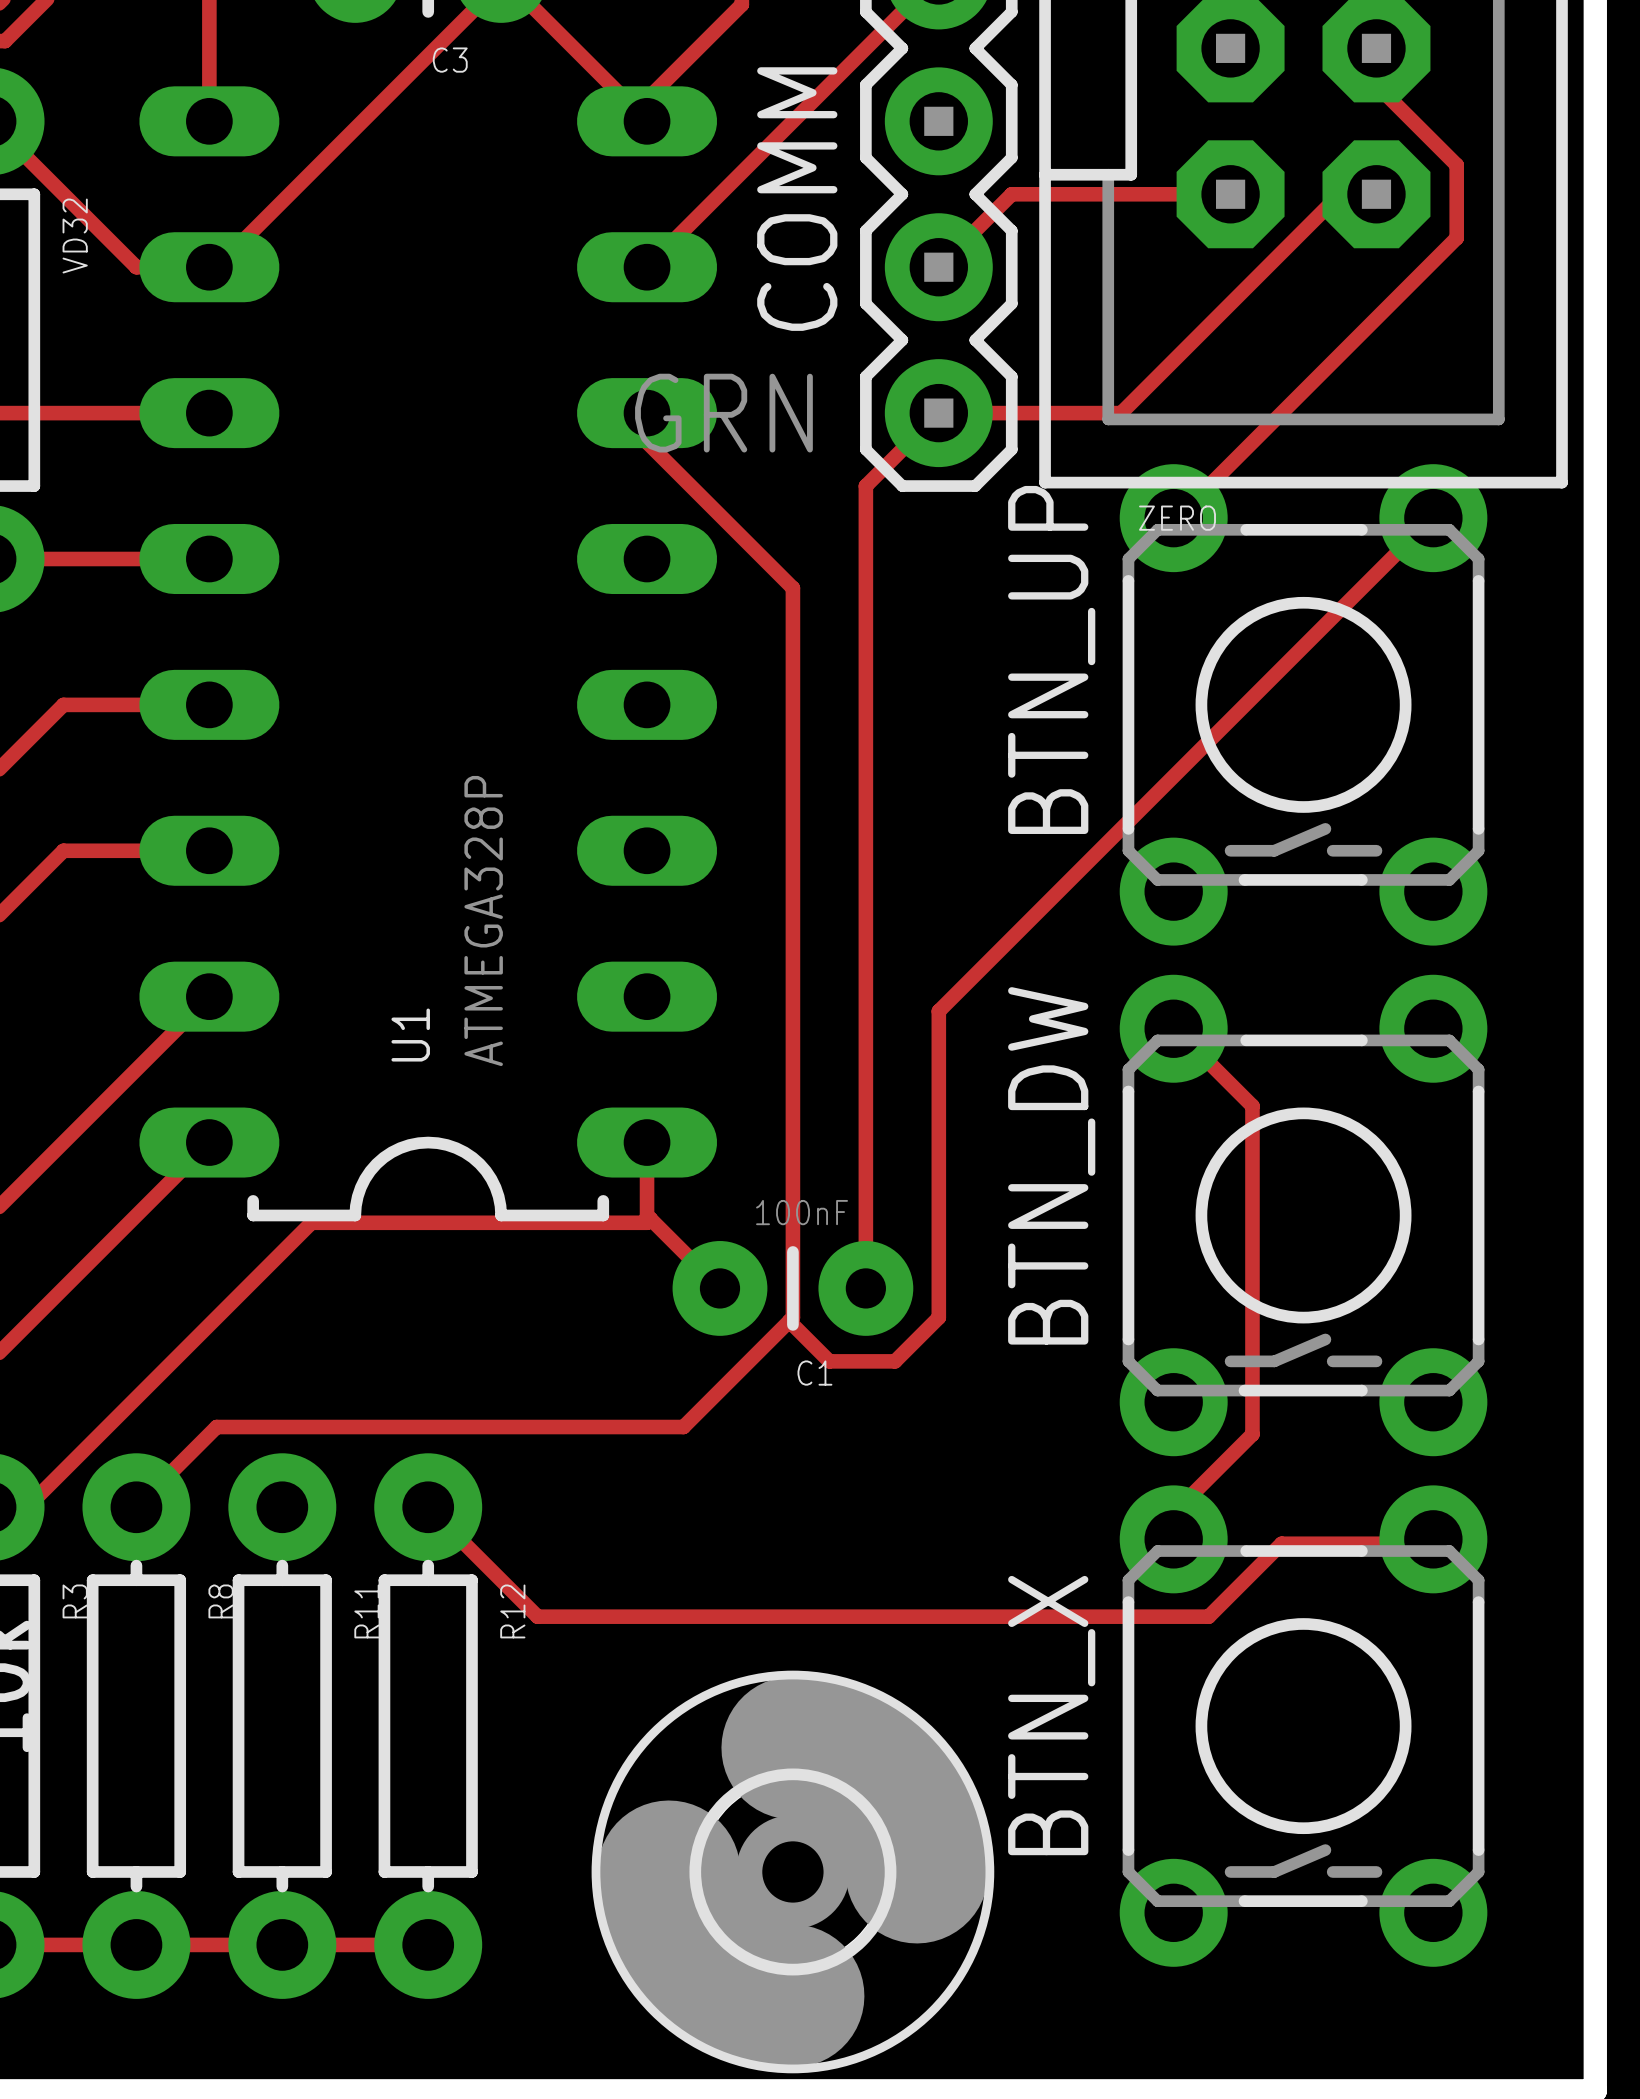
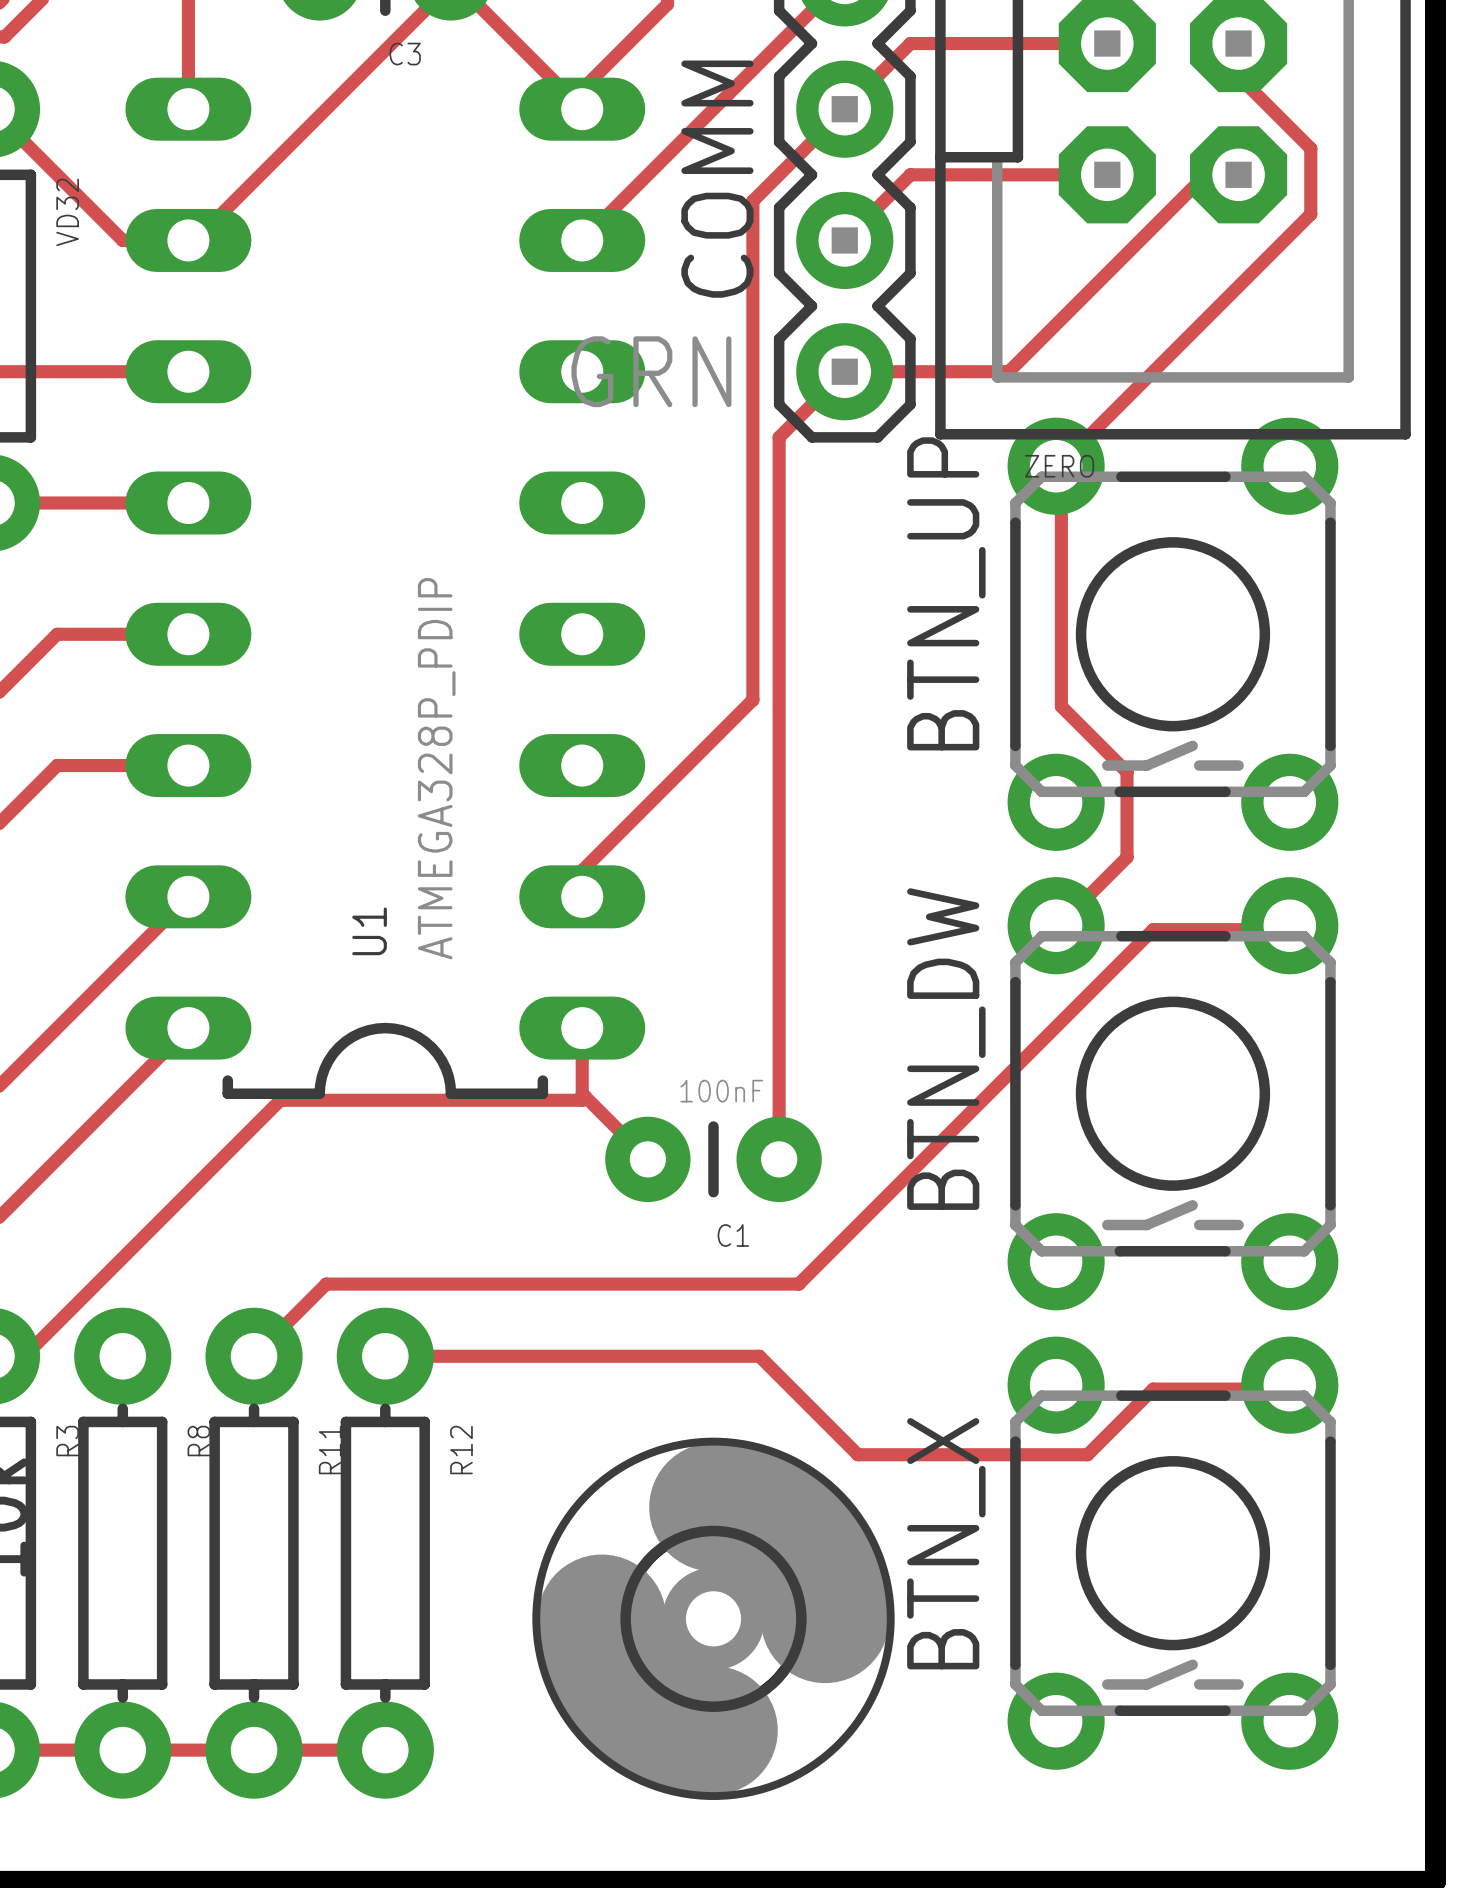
track: none -> (1107, 43) (910, 43) (752, 201) (752, 699) (582, 870) (582, 896)
track: (647, 413) (647, 442) (792, 588) (792, 1317) (683, 1427) -> (1289, 925) (1284, 929) (1153, 929) (798, 1284) (615, 1284)
track: (1433, 518) (938, 1011) (938, 1317) (895, 1361) (829, 1361) (789, 1321) -> none
U1 value: ATMEGA328P (483, 920) -> ATMEGA328P_PDIP (436, 768)
track: (1173, 1028) (1252, 1106) (1252, 1434) (1179, 1507) (1179, 1536) (1173, 1539) -> (1056, 925) (1061, 923) (1127, 857) (1127, 772) (1061, 706) (1061, 470) (1056, 466)
track: (362, 1427) (216, 1427) (136, 1507) -> (326, 1284) (254, 1356)
track: (428, 1507) (537, 1616) (953, 1616) -> (385, 1356) (759, 1356) (857, 1454)
part position: (792, 1871) -> (713, 1618)

